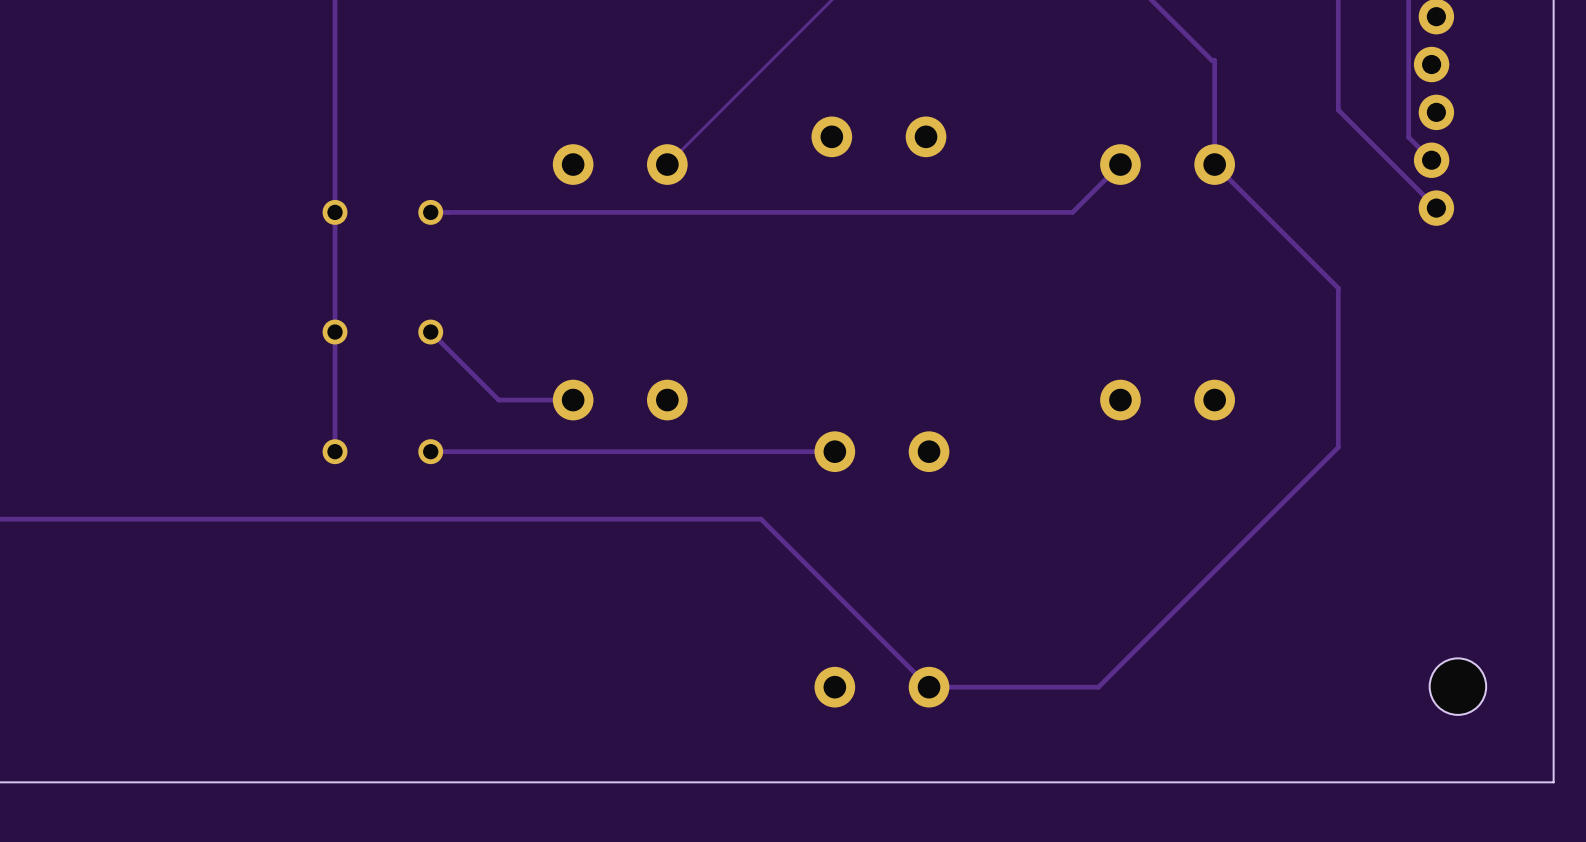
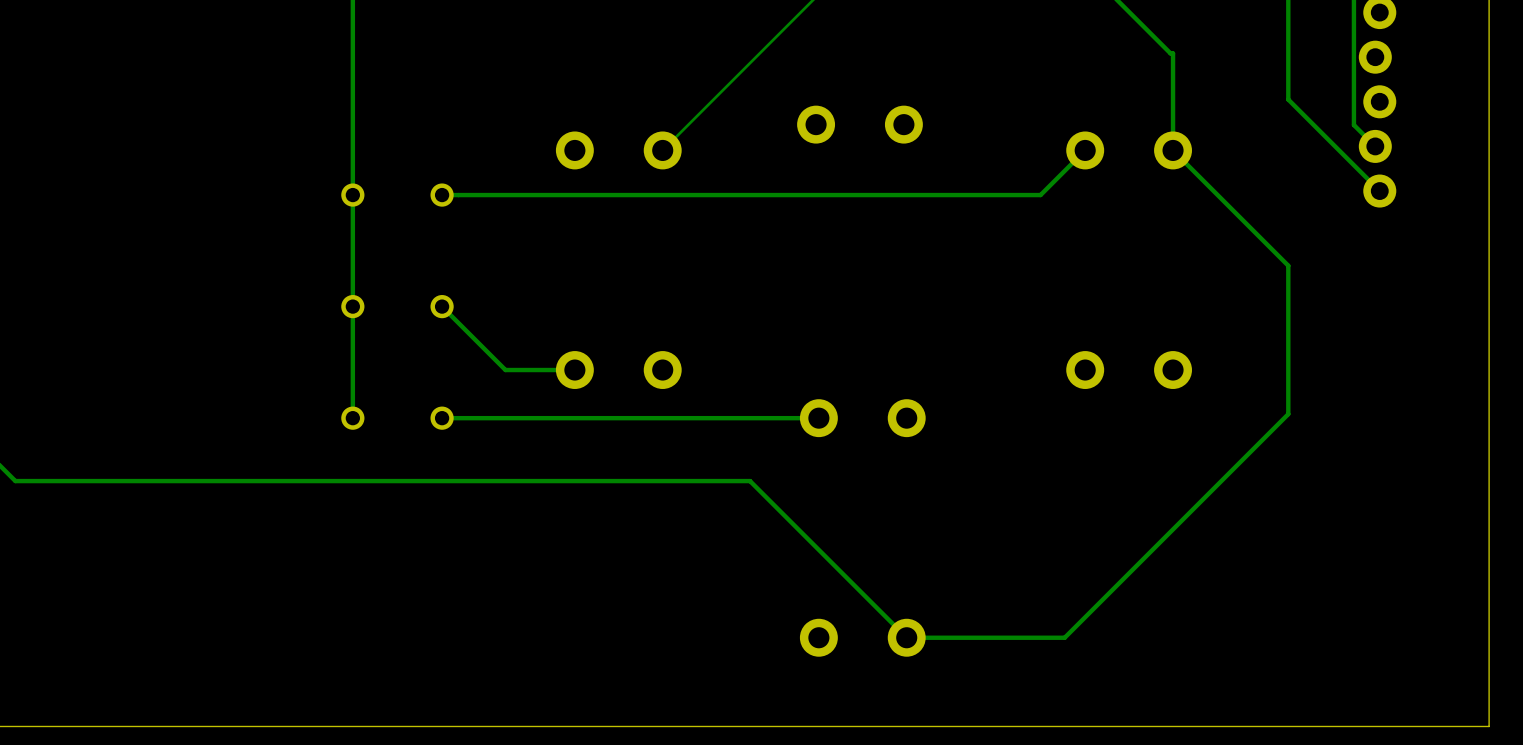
part: (1457, 686) -> none

